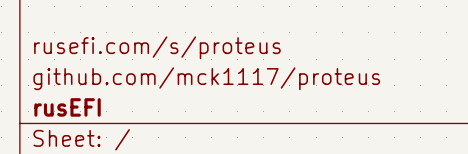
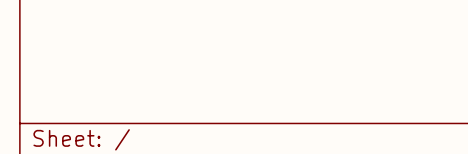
title block: rusefi.com/s/proteus (157, 47) -> none
title block: github.com/mck1117/proteus (206, 78) -> none
title block: rusEFI (67, 107) -> none

